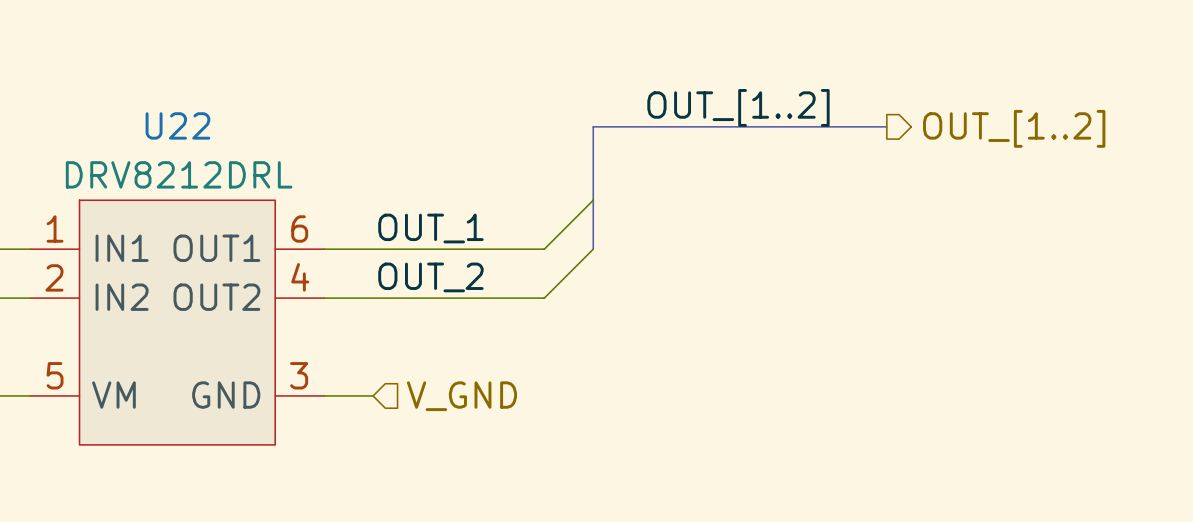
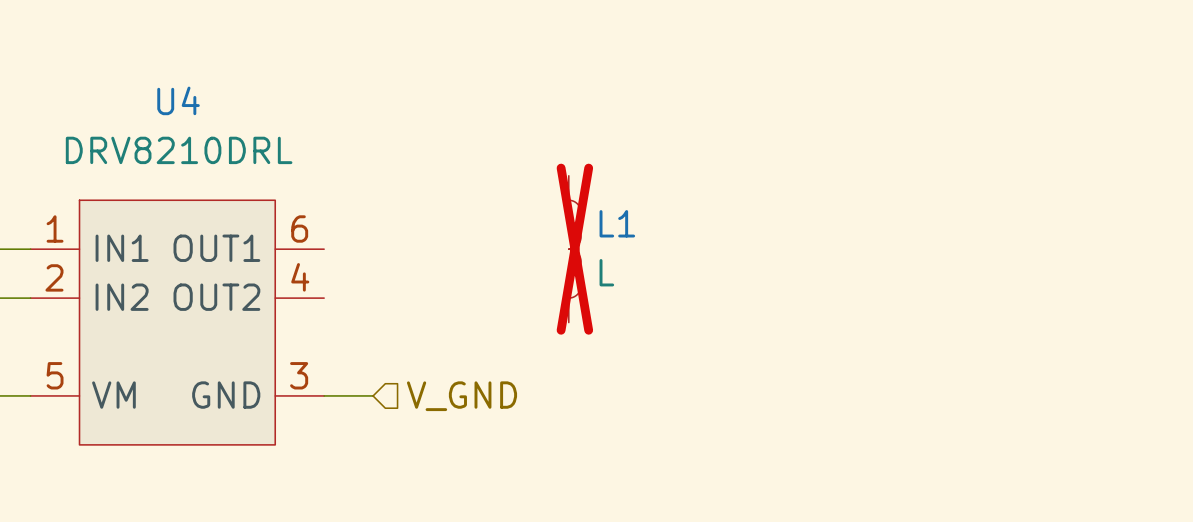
label: OUT_[1..2] (738, 107) -> none
U22 name: U22 (177, 125) -> U4 (178, 100)
bus: (886, 126) (593, 126) (593, 249) -> none
hierarchical label: OUT_[1..2] (1014, 128) -> none
U22 value: DRV8212DRL (179, 174) -> DRV8210DRL (179, 150)
wire: (593, 200) (544, 249) (324, 249) -> none
label: OUT_1 (430, 228) -> none
L1: none -> L (574, 249)
wire: (593, 249) (544, 298) (324, 298) -> none
label: OUT_2 (430, 277) -> none

